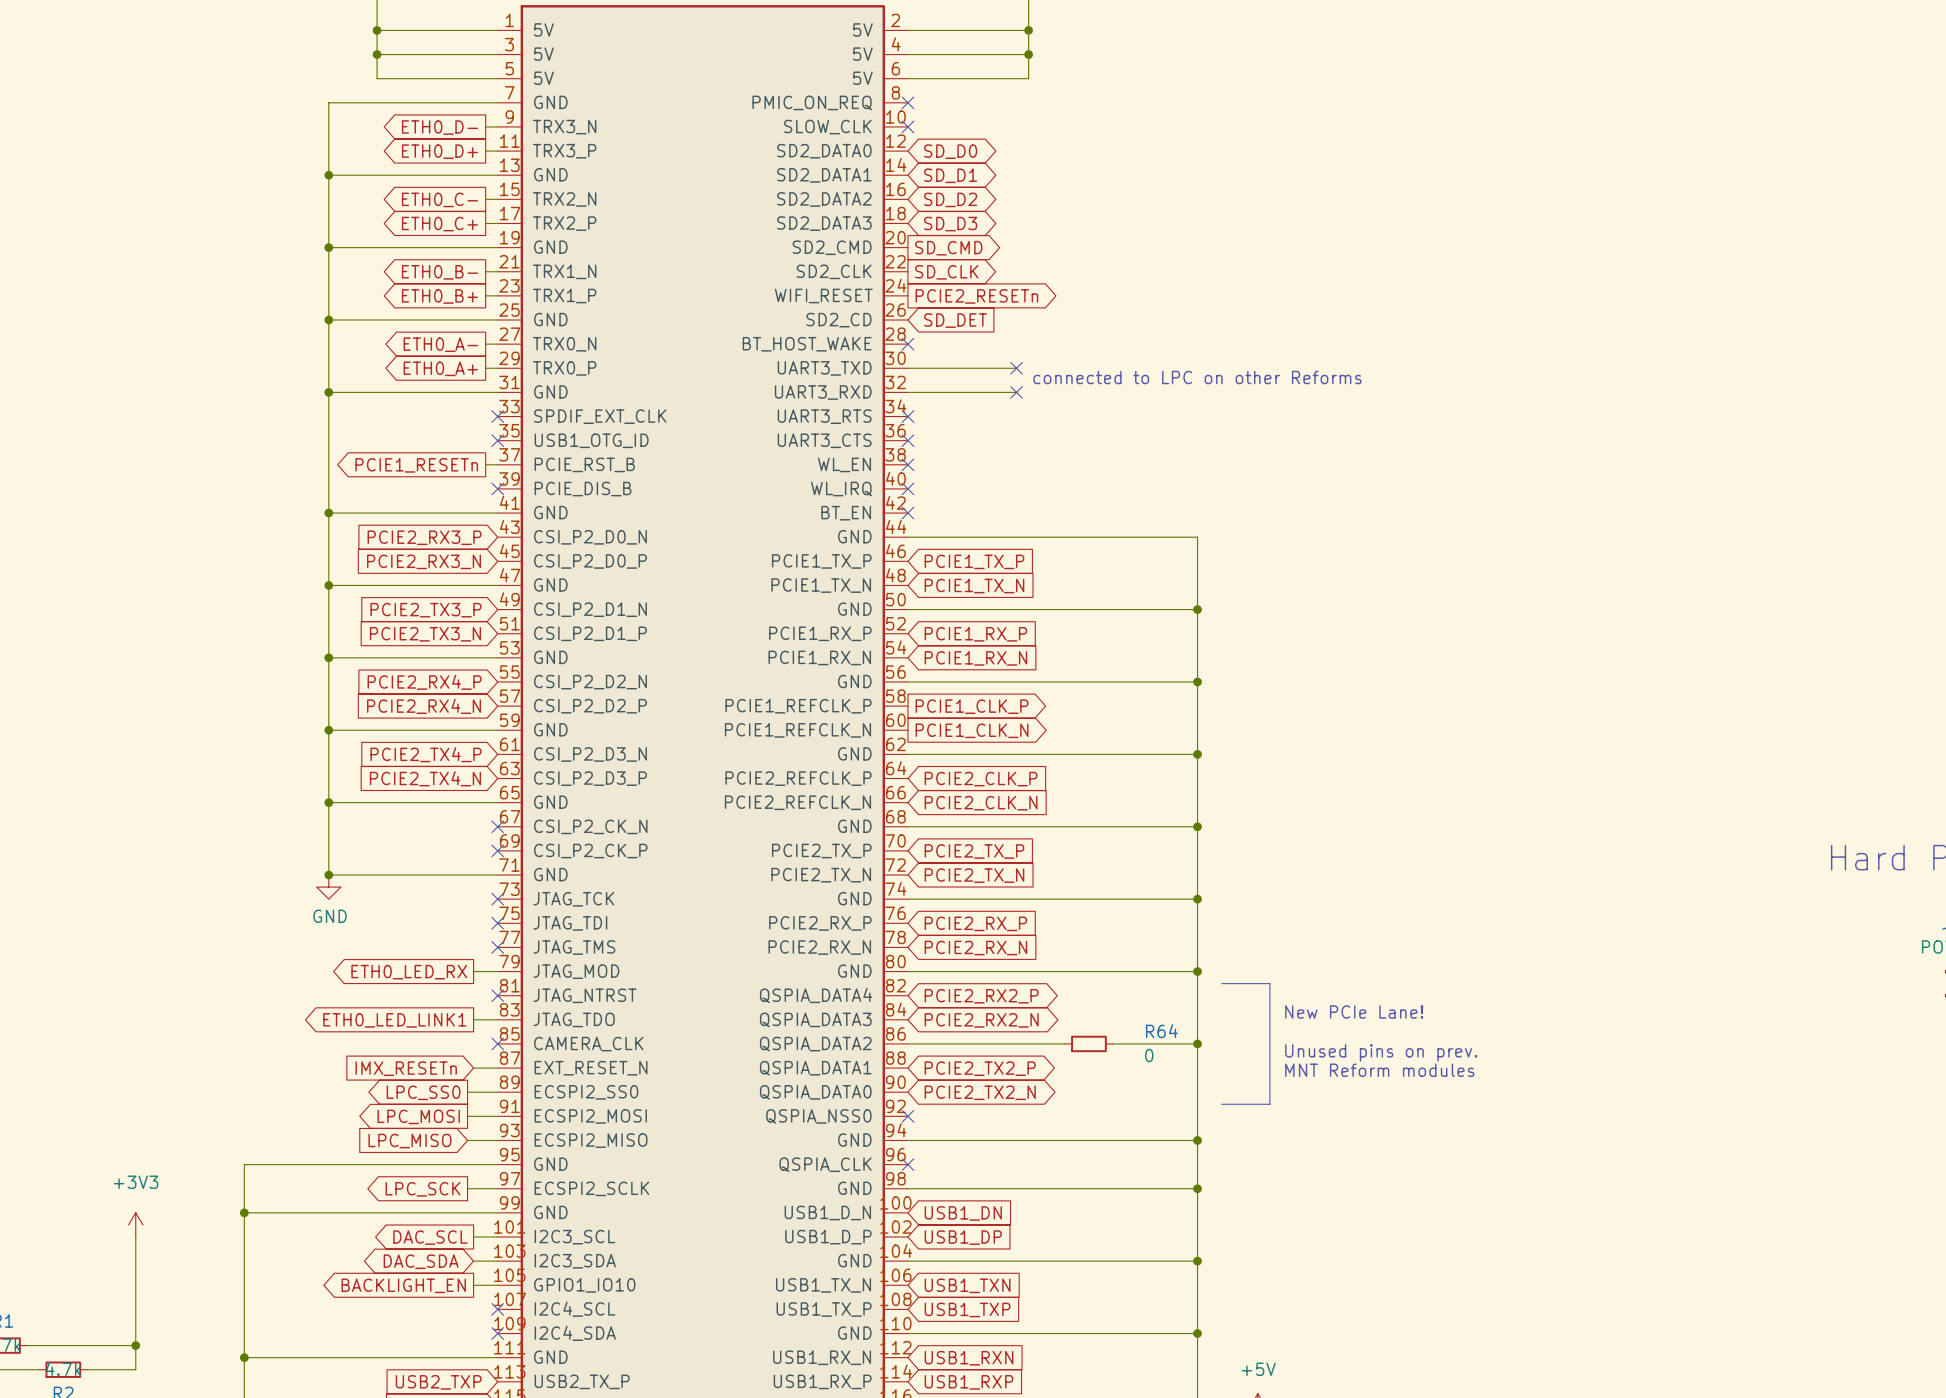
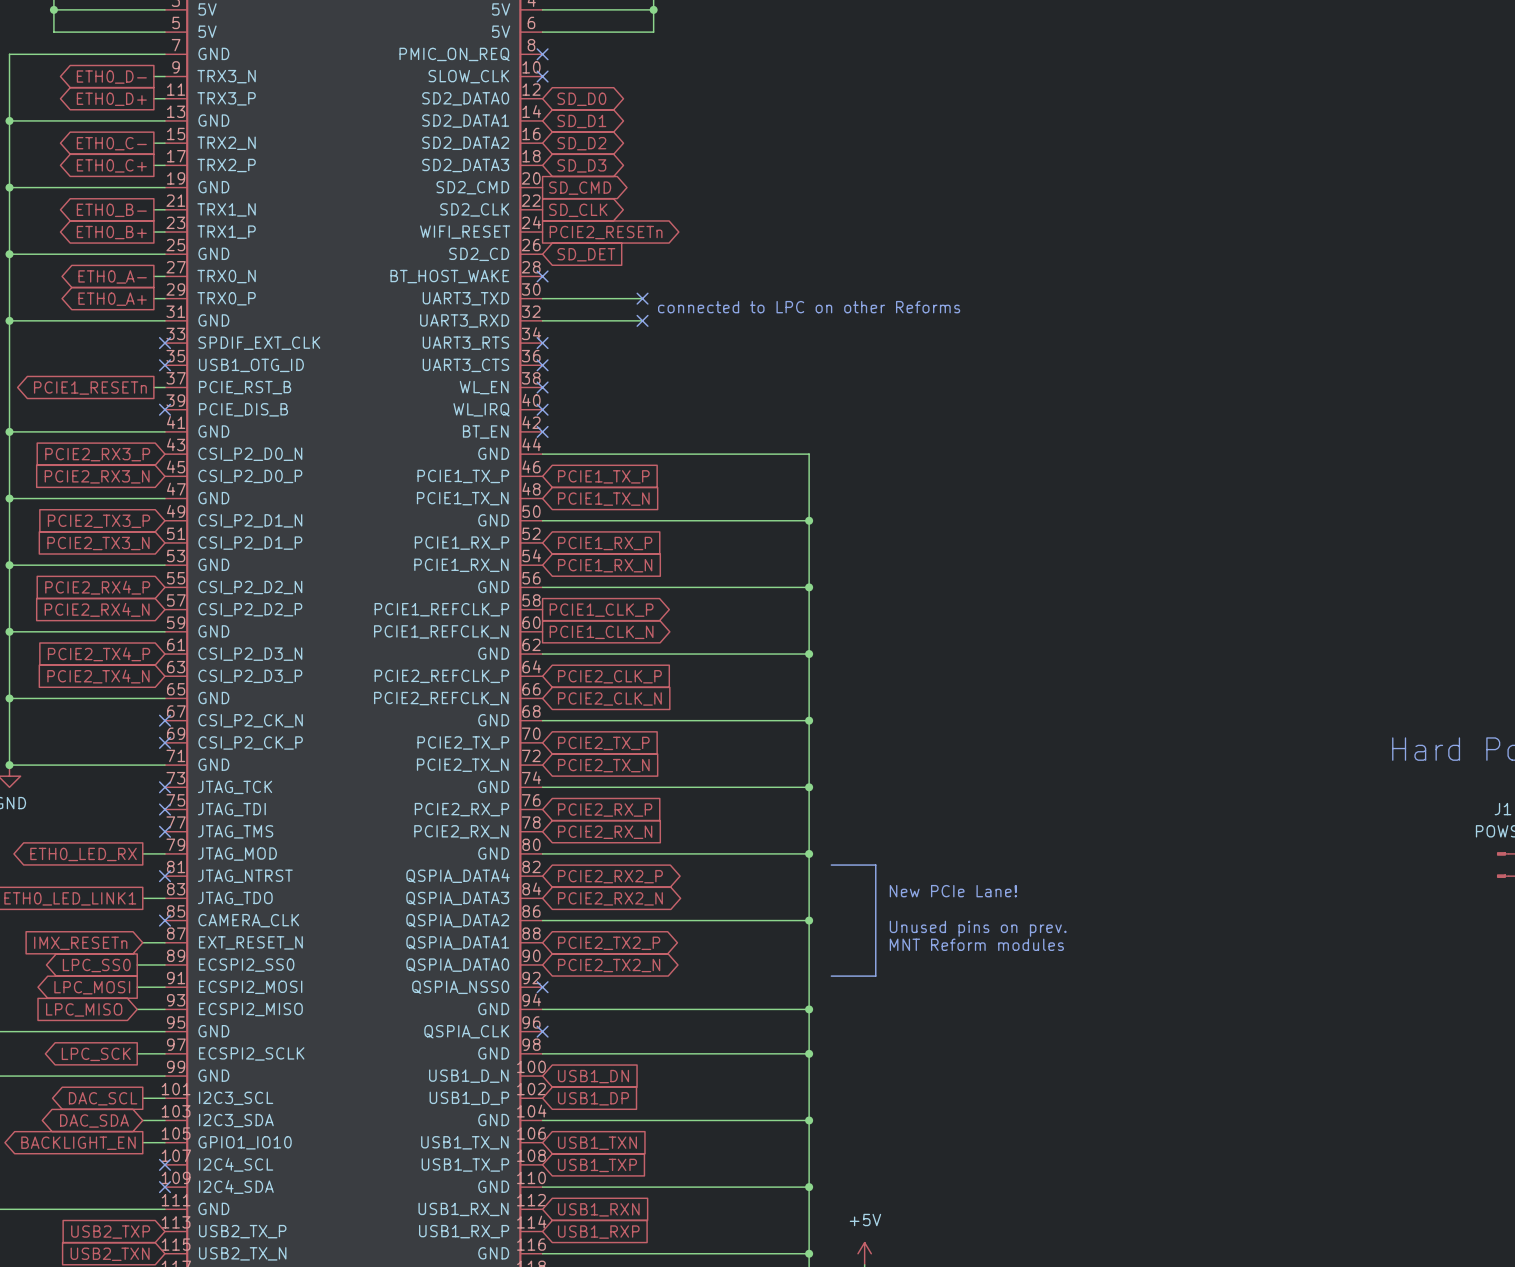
wire: none -> (686, 920) (731, 920)
R64: 0 (1088, 1043) -> none

